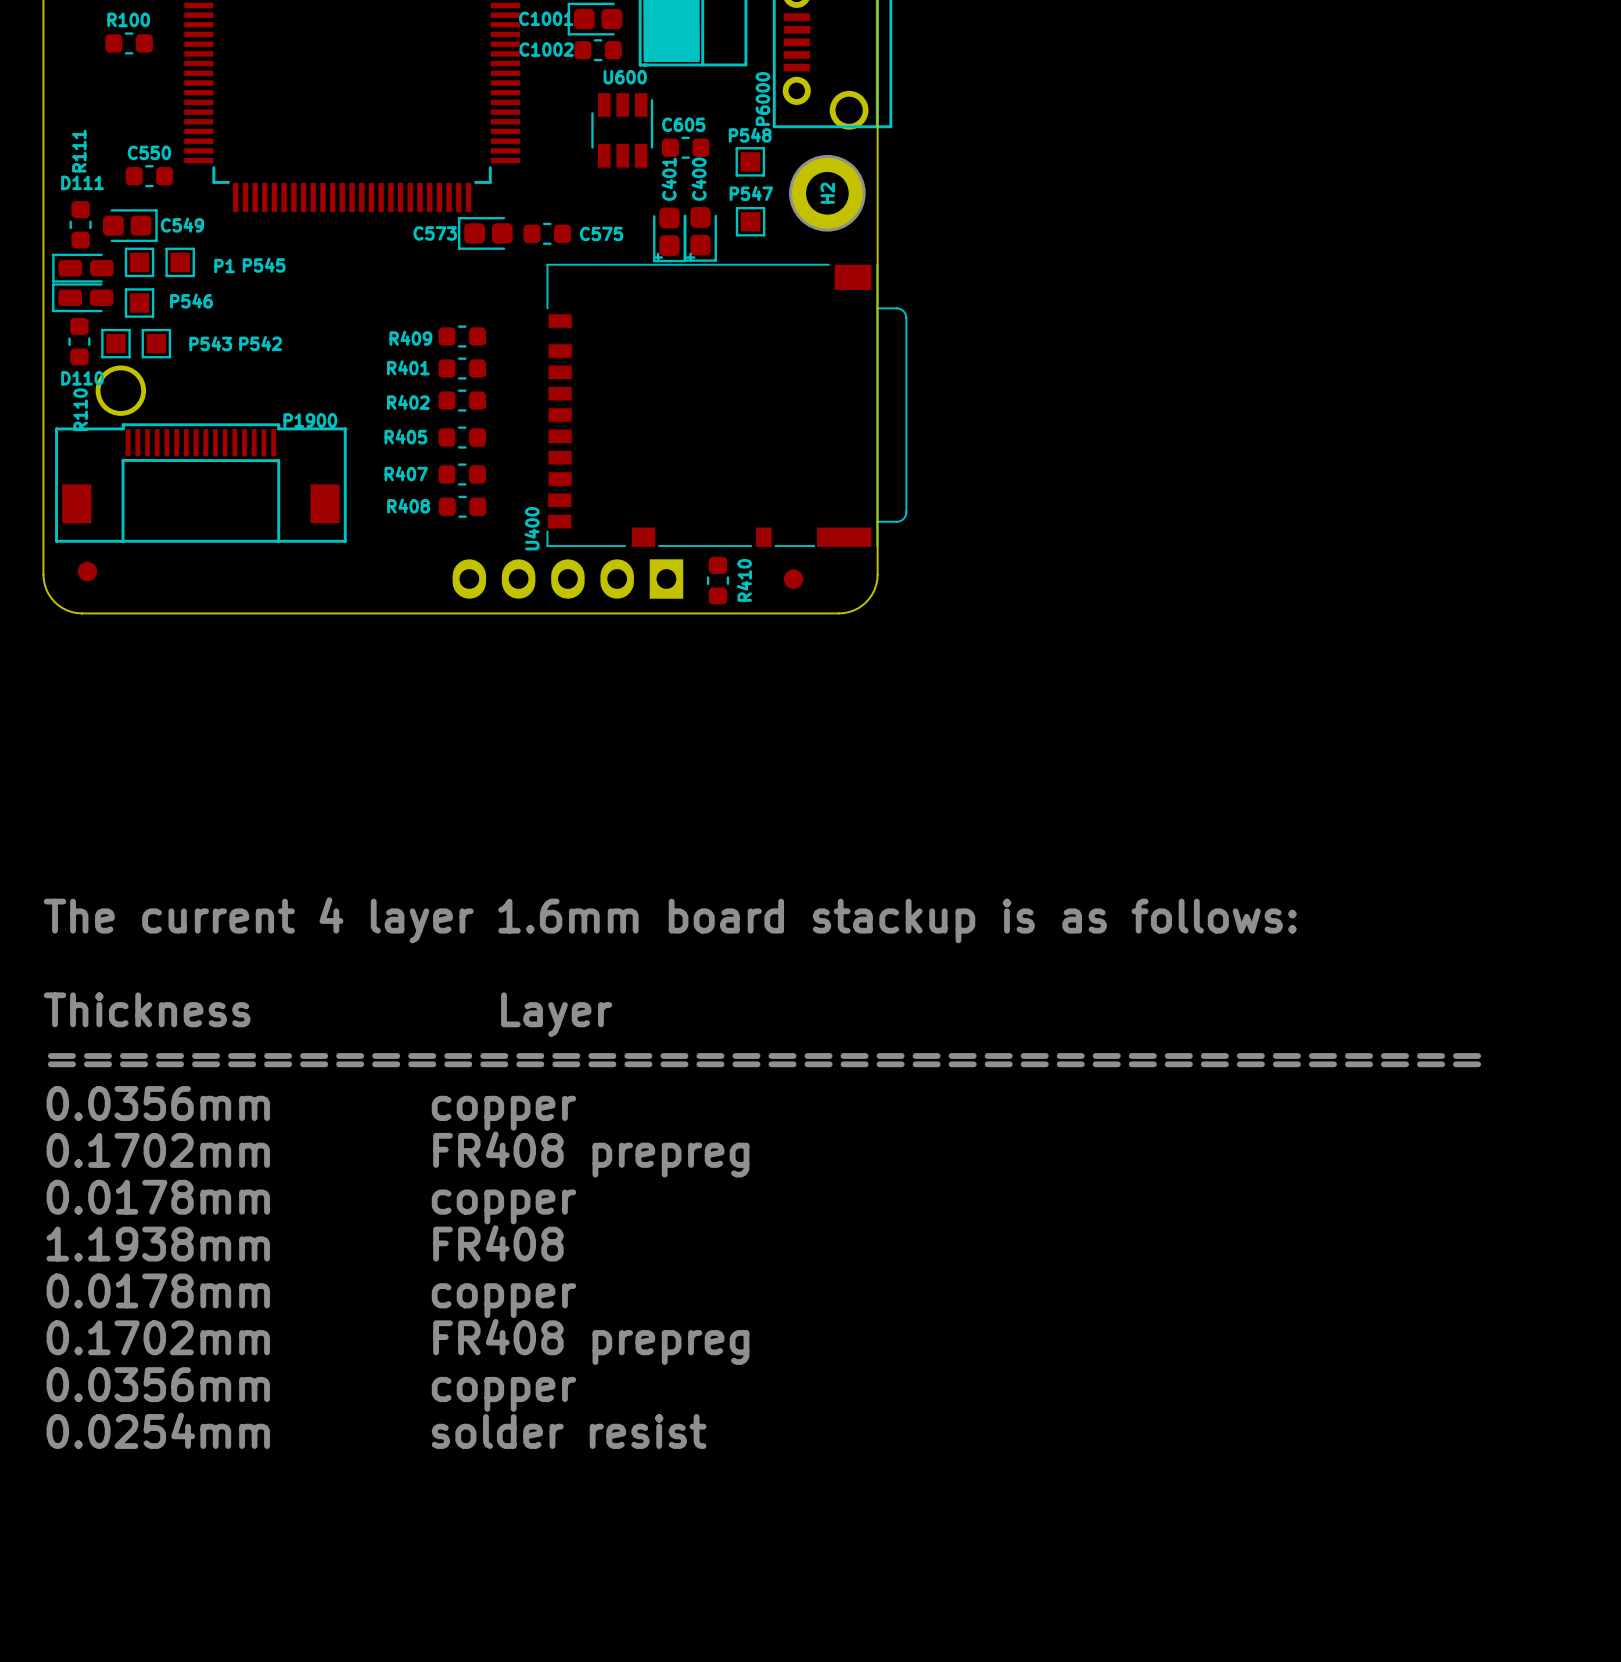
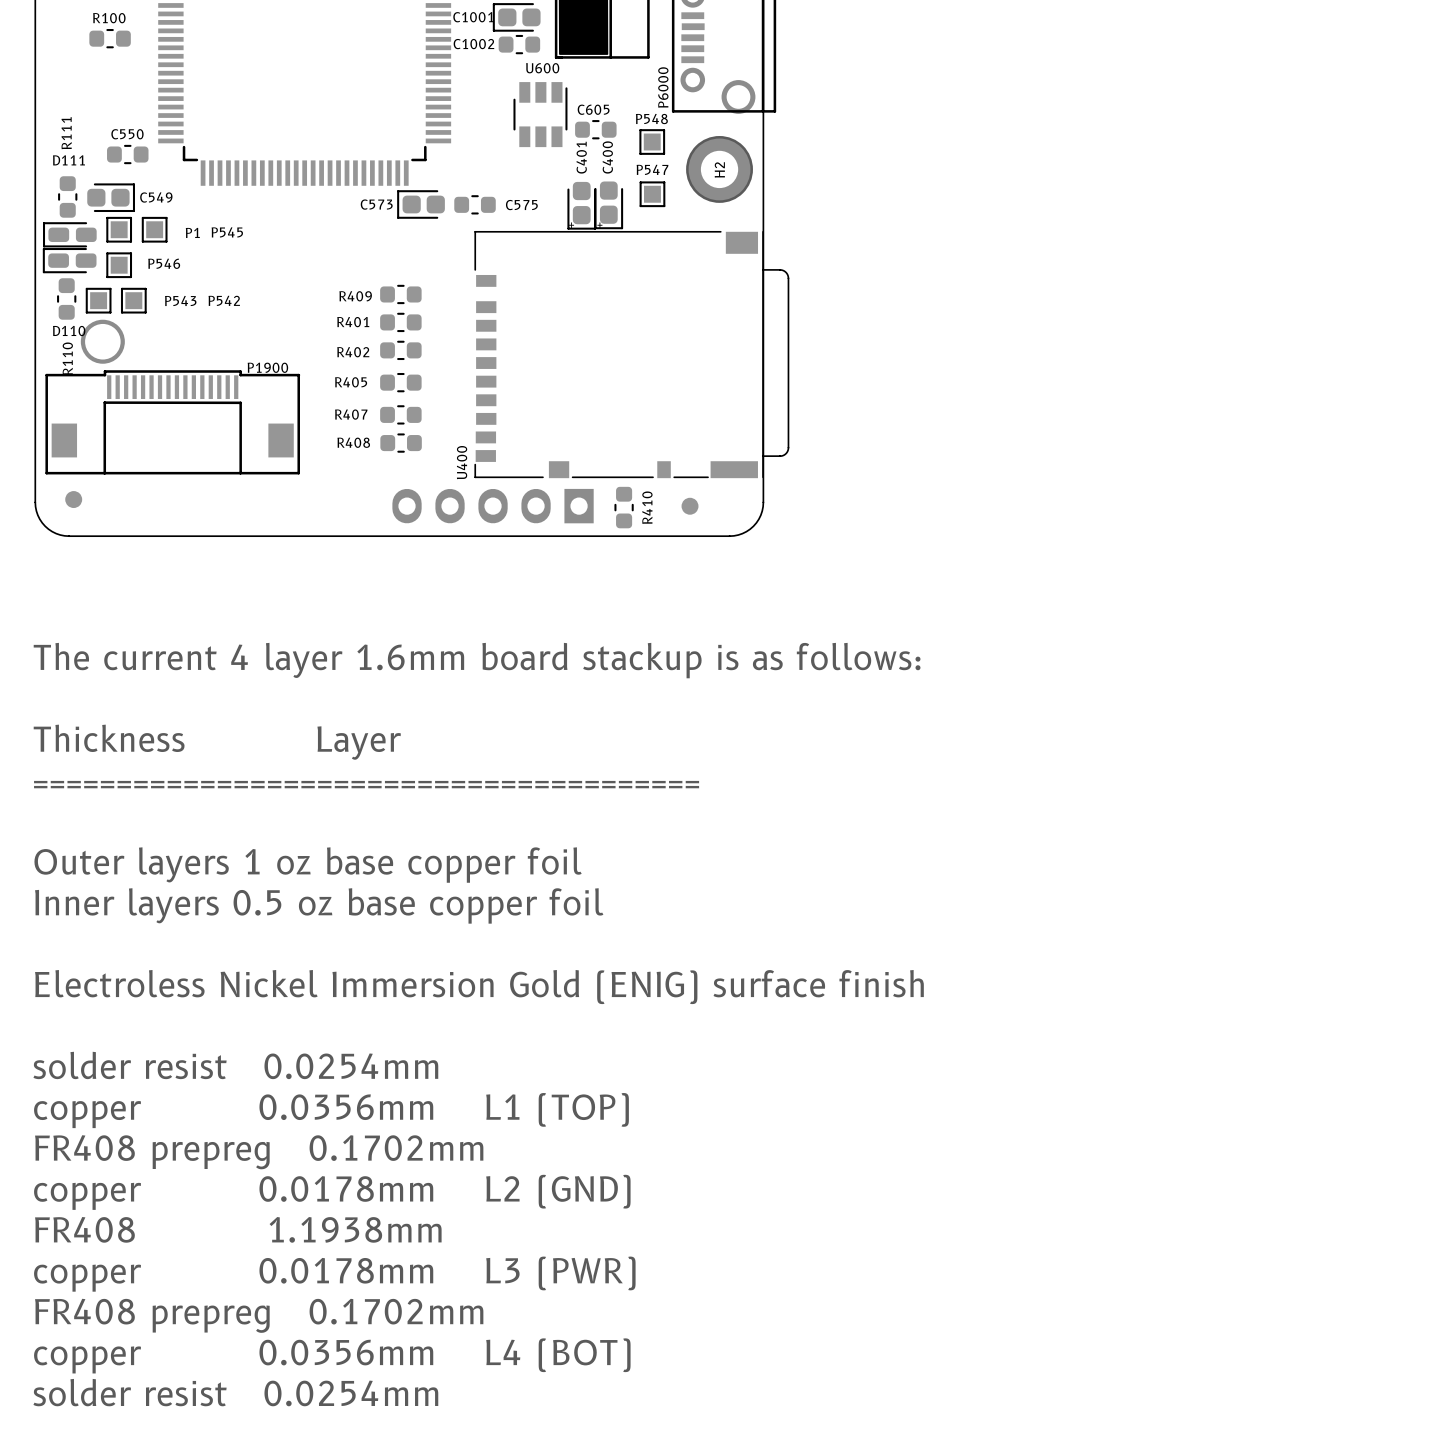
text position: The current 4 layer 1.6mm board stackup is as follows: (670, 920) -> The current 4 layer 1.6mm board stackup is as follows: (477, 660)
text: none -> Outer layers 1 oz base copper foil (308, 865)
text position: Thickness Layer (327, 1014) -> Thickness Layer (217, 742)
text: none -> Inner layers 0.5 oz base copper foil (319, 905)
text position: ======================================== (764, 1060) -> ======================================== (366, 784)
text: 0.0356mm copper (311, 1108) -> none
text: none -> Electroless Nickel Immersion Gold (ENIG) surface finish (479, 987)
text: 0.1702mm FR408 prepreg (397, 1154) -> none
text: 0.0178mm copper (311, 1202) -> none
text: none -> solder resist 0.0254mm (235, 1065)
text: 1.1938mm FR408 (305, 1243) -> none
text: none -> copper 0.0356mm L1 (TOP) (331, 1110)
text: 0.0178mm copper (311, 1295) -> none
text: none -> FR408 prepreg 0.1702mm (259, 1152)
text: 0.1702mm FR408 prepreg (397, 1341) -> none
text: none -> copper 0.0178mm L2 (GND) (332, 1192)
text: 0.0356mm copper (311, 1389) -> none
text: none -> FR408 1.1938mm (238, 1229)
text: 0.0254mm solder resist (376, 1430) -> none
text: none -> copper 0.0178mm L3 (PWR) (334, 1274)
text: none -> FR408 prepreg 0.1702mm (259, 1315)
text: none -> copper 0.0356mm L4 (BOT) (332, 1355)
text: none -> solder resist 0.0254mm (235, 1392)

